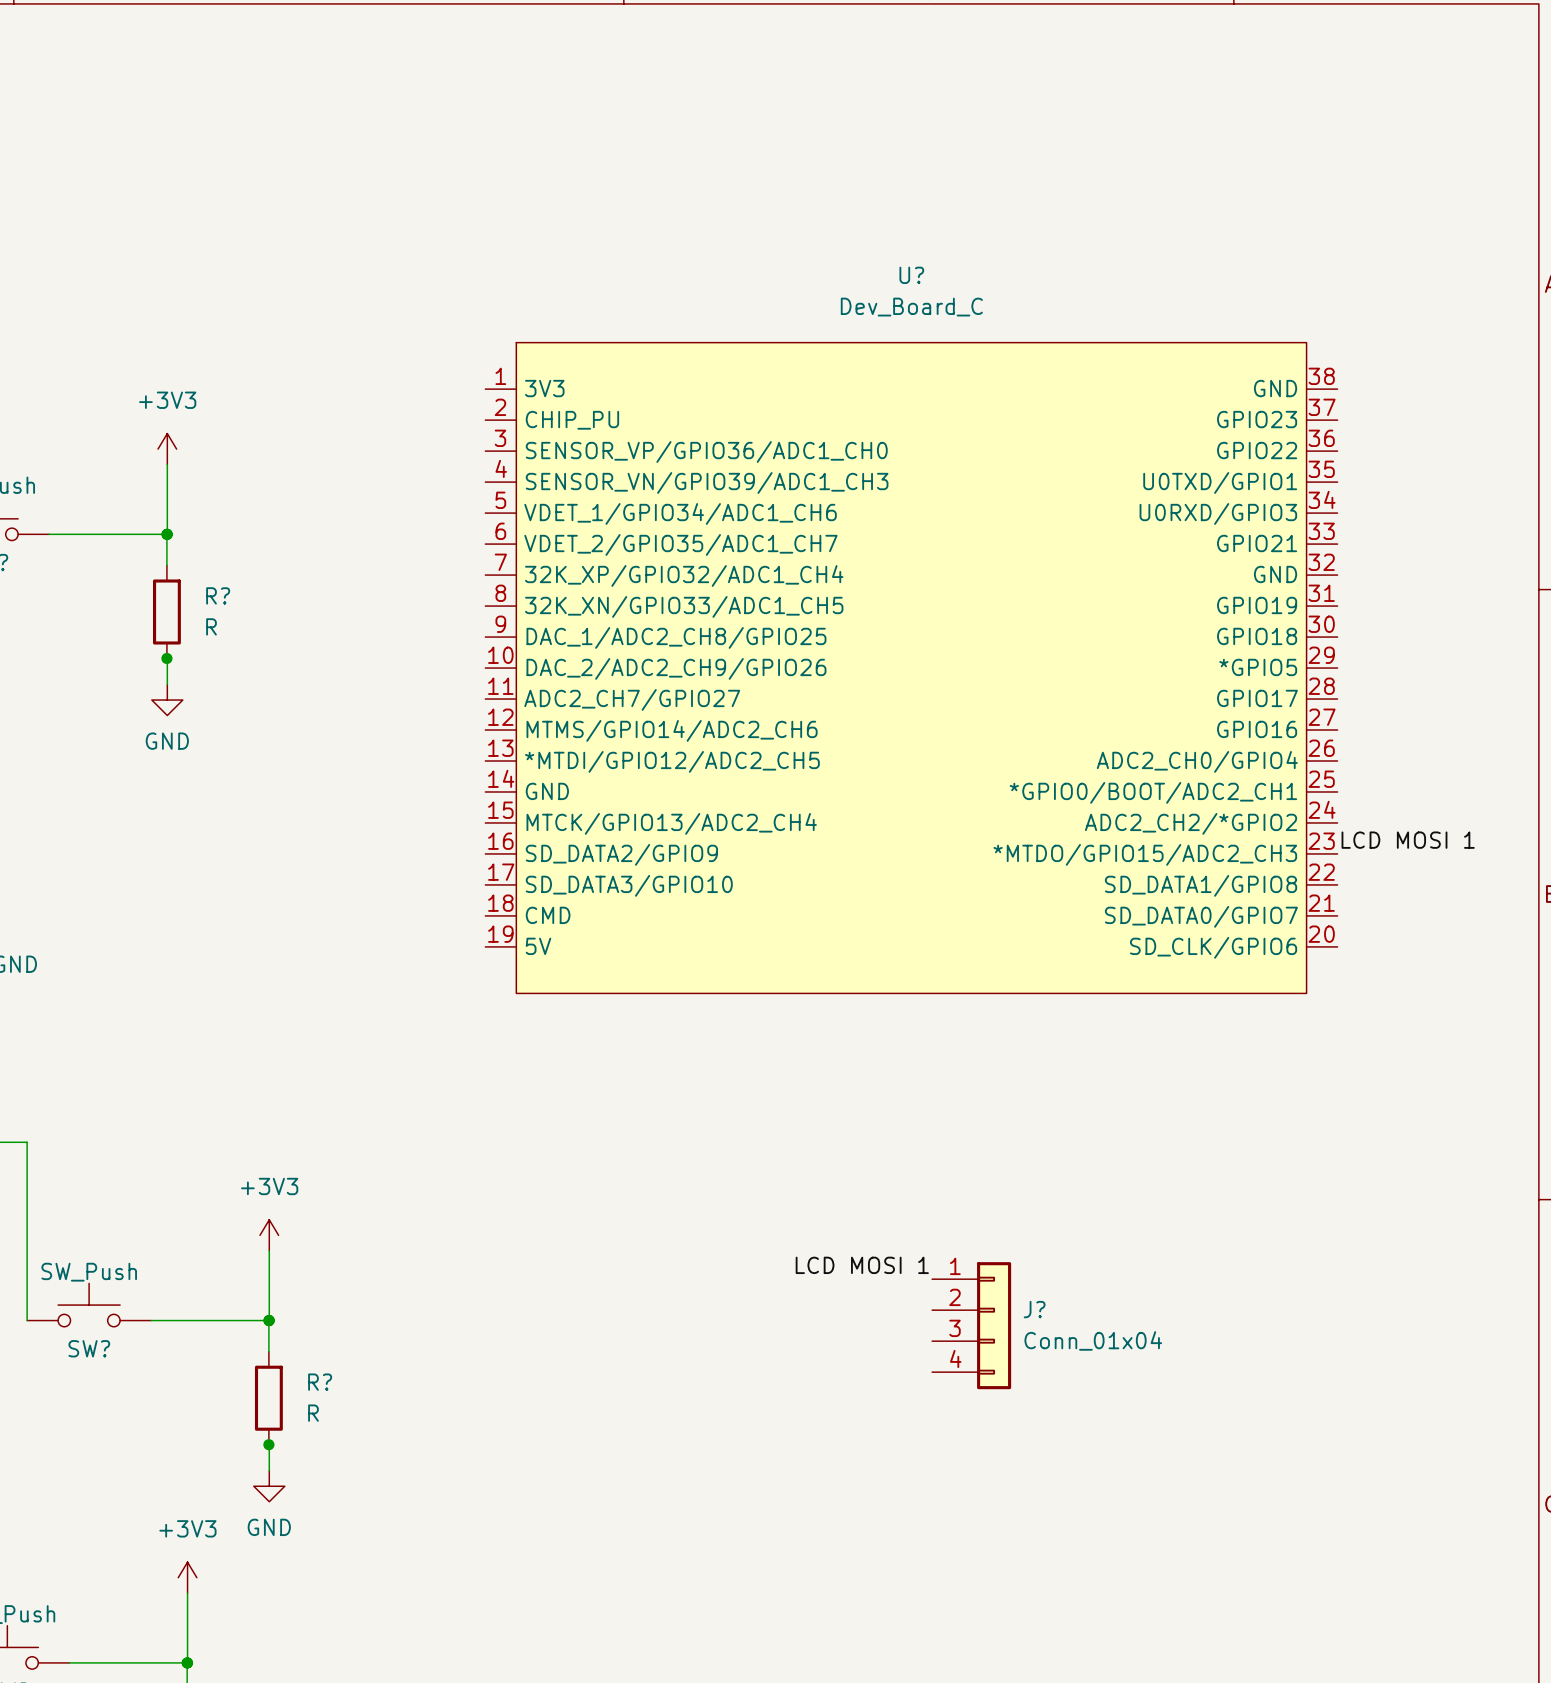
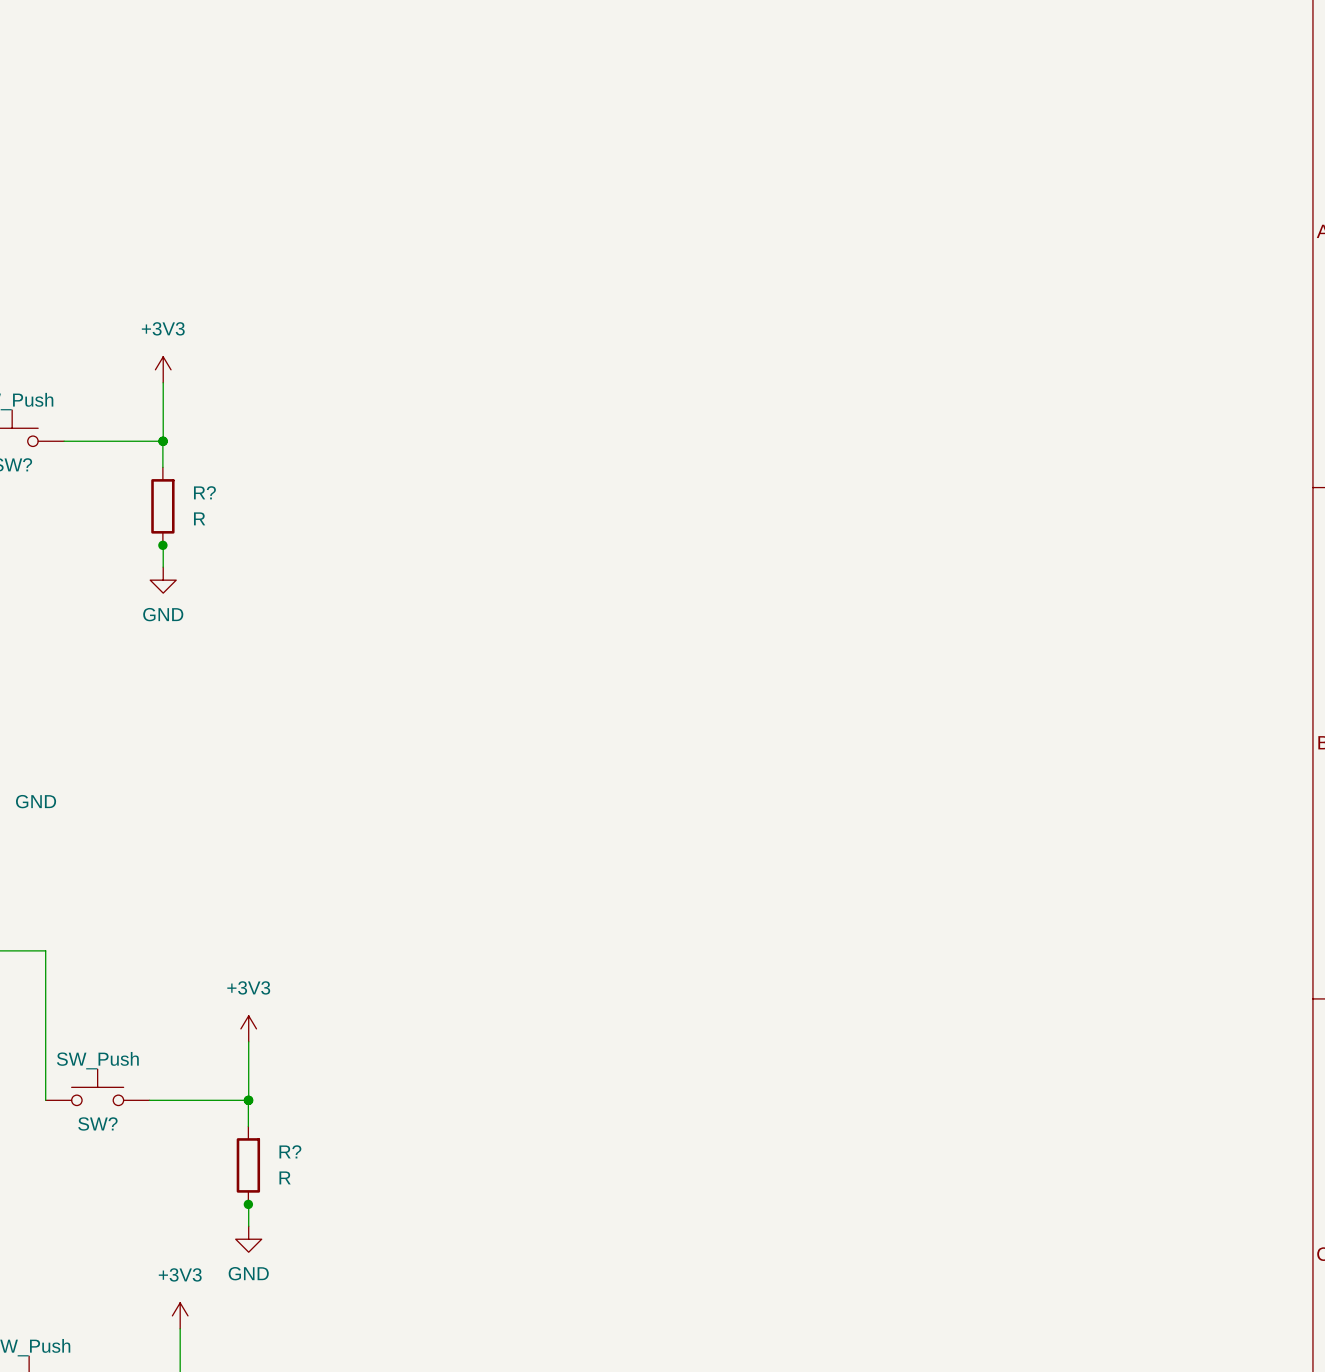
U?: Dev_Board_C (911, 668) -> none
label: LCD MOSI 1 (1408, 840) -> none
label: LCD MOSI 1 (862, 1265) -> none
J?: Conn_01x04 (971, 1325) -> none

